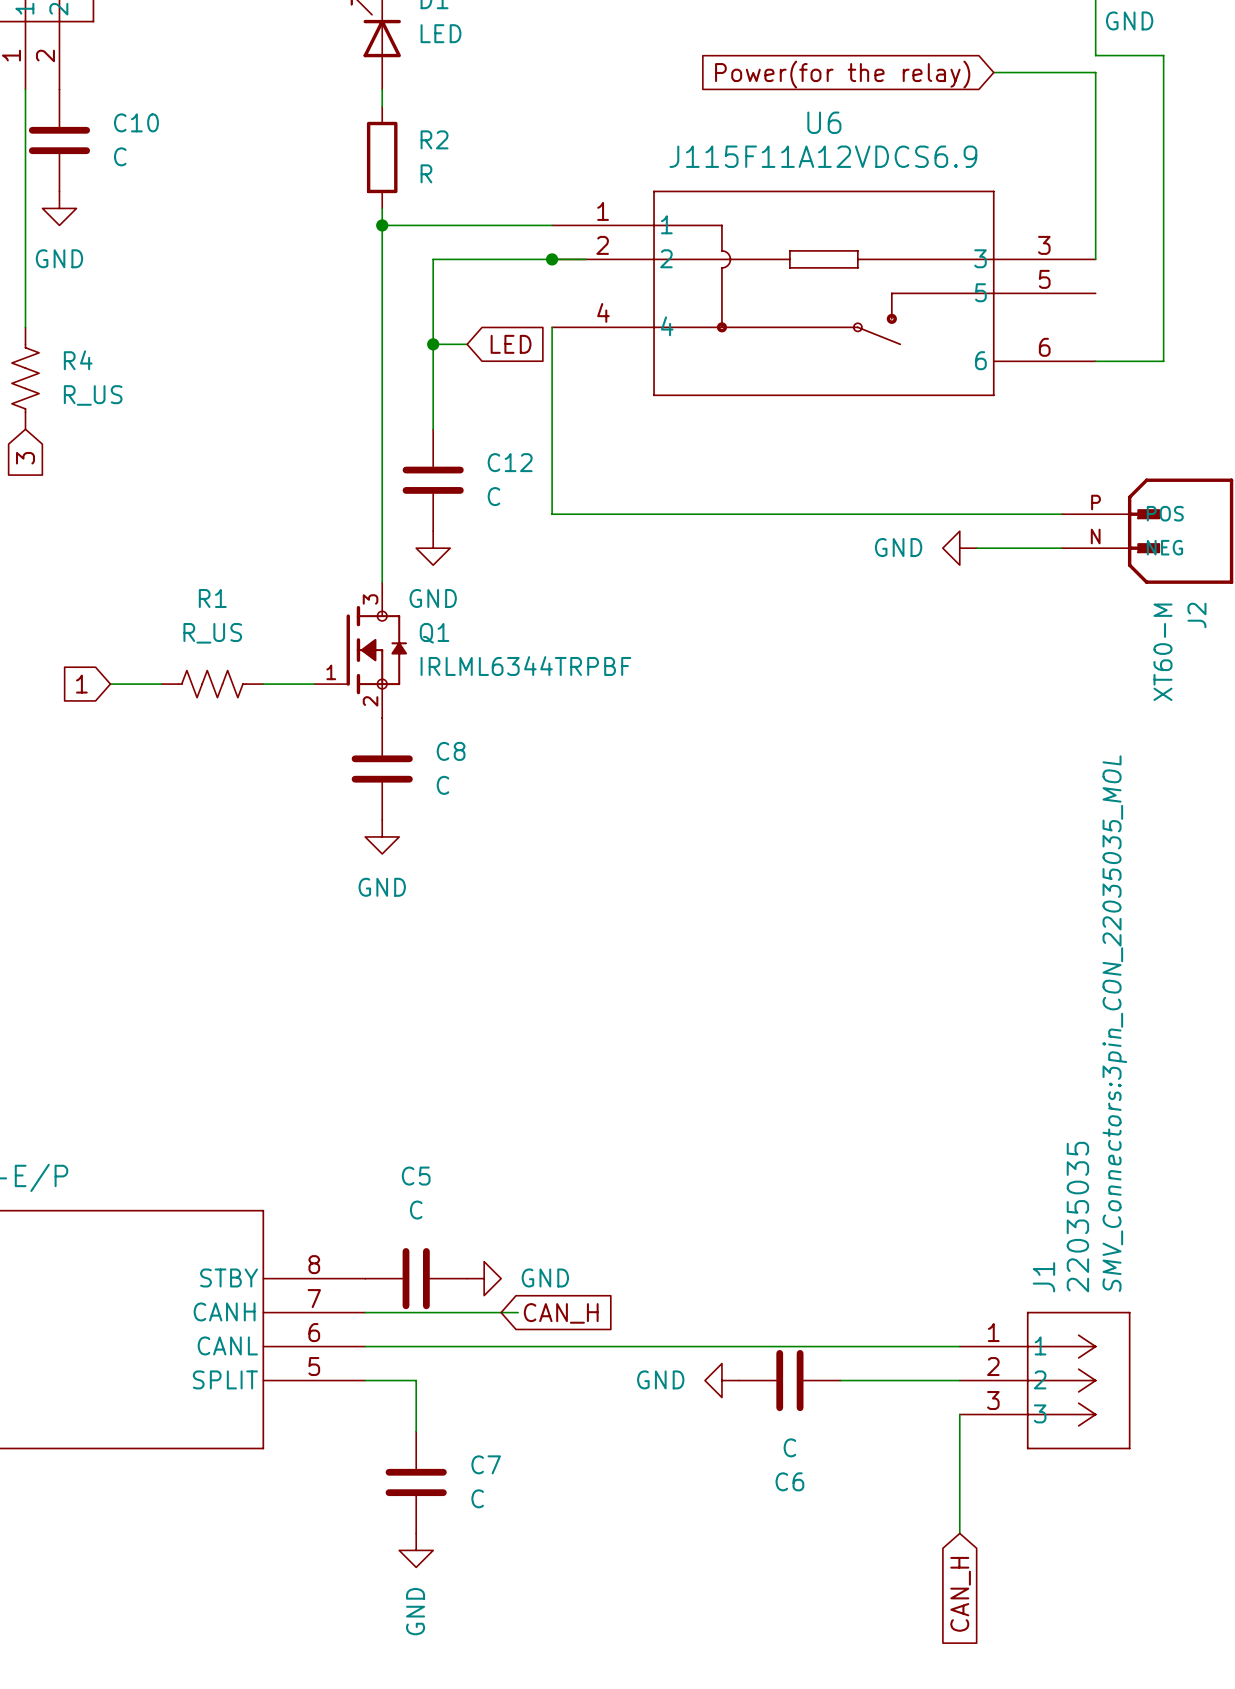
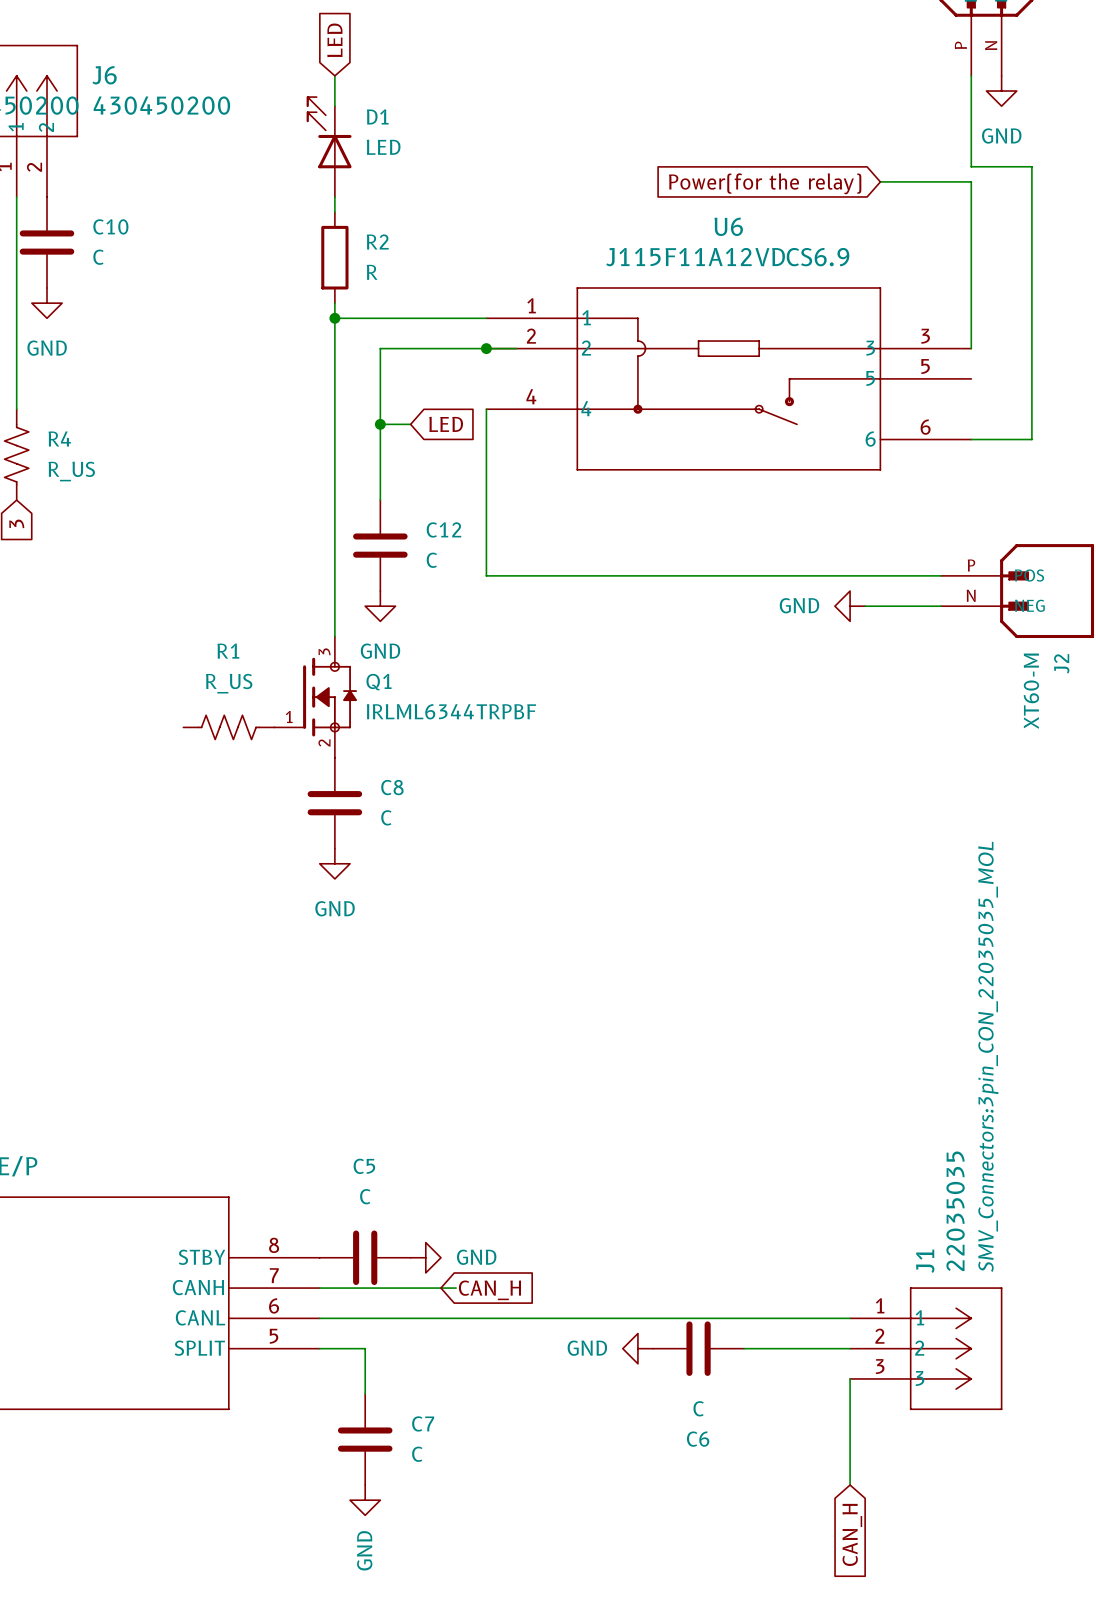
global label: 1 (81, 684) -> none
wire: (110, 684) (161, 684) -> none
R1 position: (212, 684) -> (228, 727)

